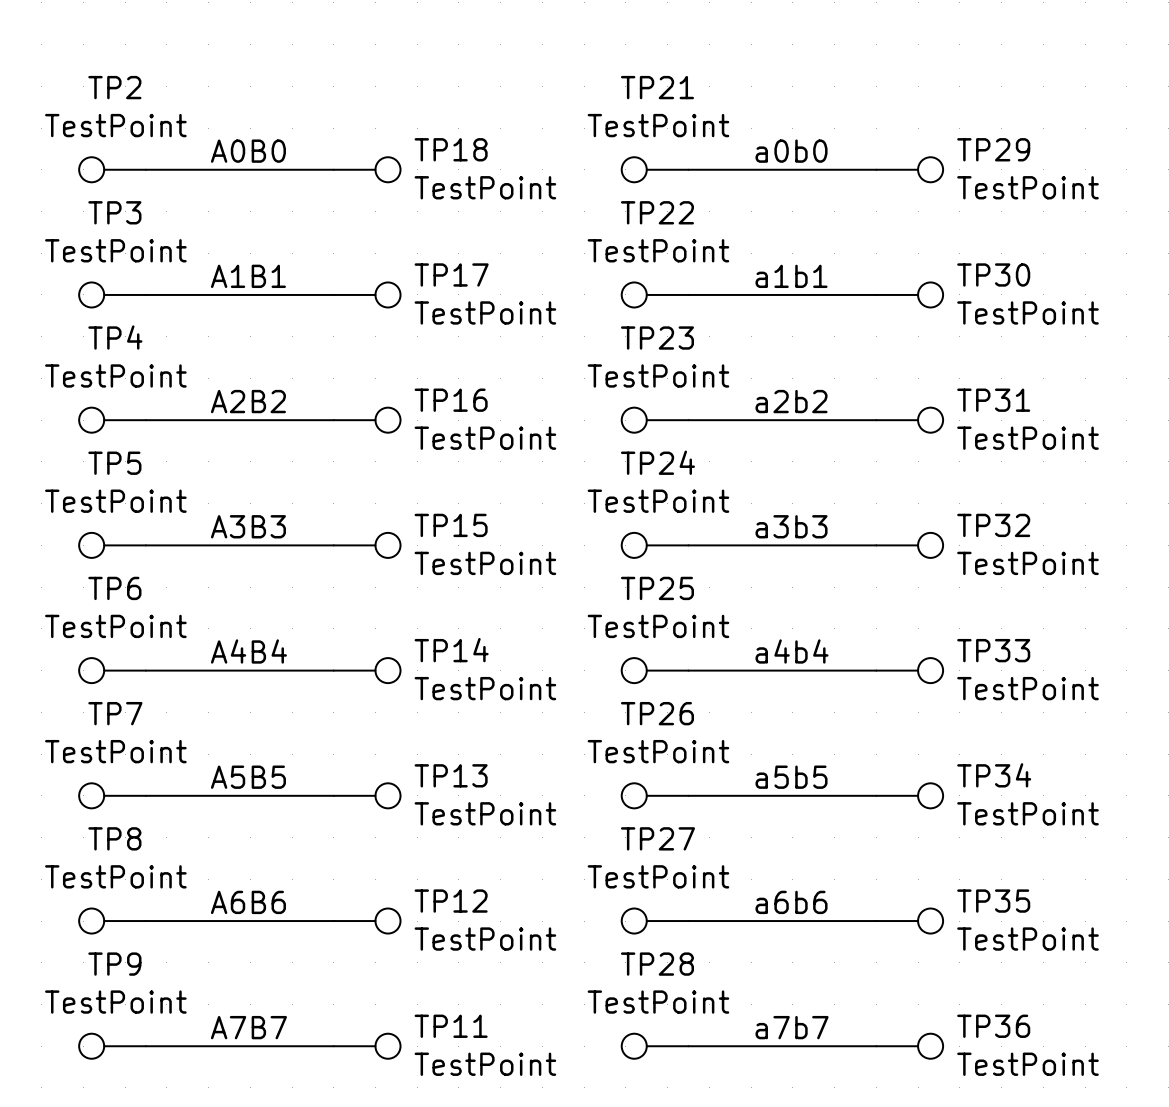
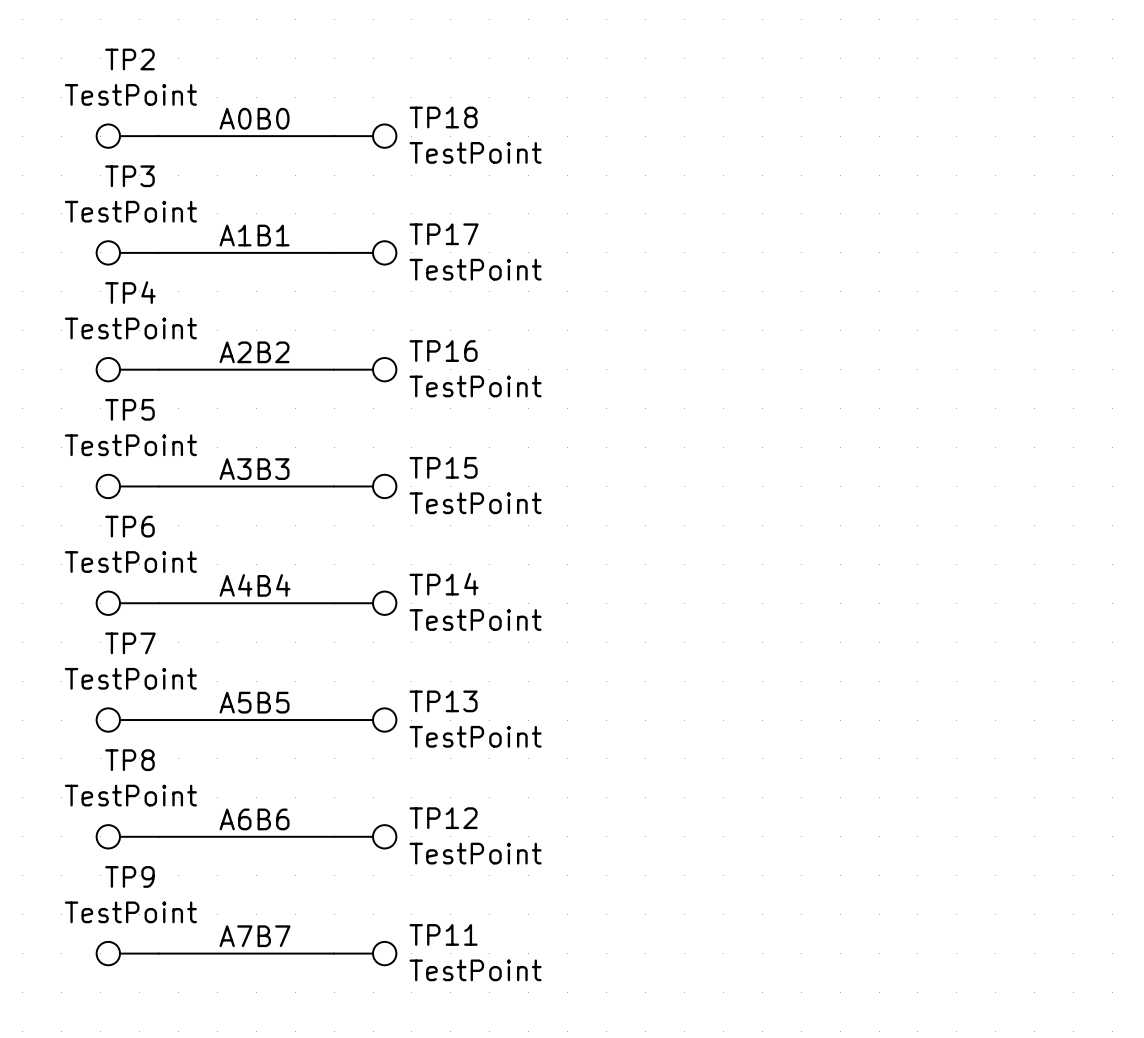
label: a0b0 (791, 151) -> none
TP21: TestPoint (655, 169) -> none
wire: (688, 169) (876, 169) -> none
TP29: TestPoint (909, 169) -> none
label: a1b1 (791, 276) -> none
TP22: TestPoint (655, 294) -> none
wire: (688, 294) (876, 294) -> none
TP30: TestPoint (909, 294) -> none
label: a2b2 (791, 401) -> none
TP23: TestPoint (655, 420) -> none
wire: (688, 420) (876, 420) -> none
TP31: TestPoint (909, 420) -> none
label: a3b3 (791, 526) -> none
TP24: TestPoint (655, 545) -> none
wire: (688, 545) (876, 545) -> none
TP32: TestPoint (909, 545) -> none
label: a4b4 (792, 651) -> none
TP25: TestPoint (655, 670) -> none
wire: (688, 670) (876, 670) -> none
TP33: TestPoint (909, 670) -> none
label: a5b5 (791, 777) -> none
TP26: TestPoint (655, 795) -> none
wire: (688, 795) (876, 795) -> none
TP34: TestPoint (909, 795) -> none
label: a6b6 (791, 902) -> none
TP27: TestPoint (655, 921) -> none
wire: (688, 921) (876, 921) -> none
TP35: TestPoint (909, 921) -> none
label: a7b7 (792, 1027) -> none
TP28: TestPoint (655, 1046) -> none
wire: (688, 1046) (876, 1046) -> none
TP36: TestPoint (909, 1046) -> none

